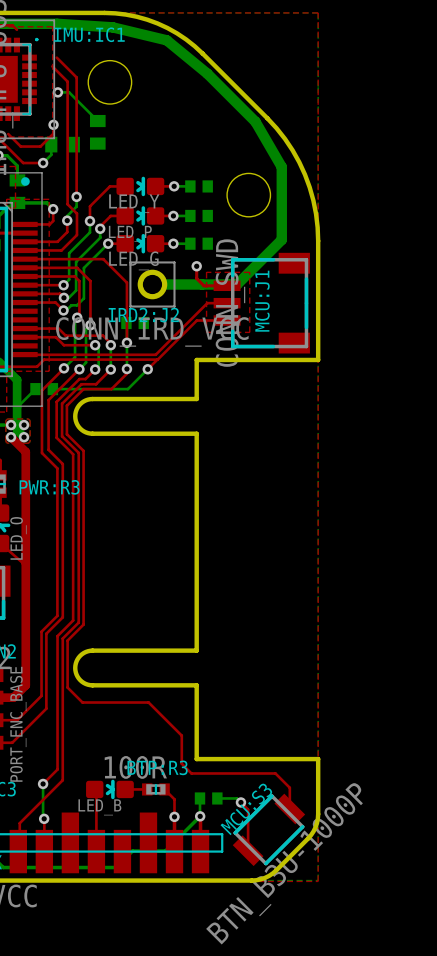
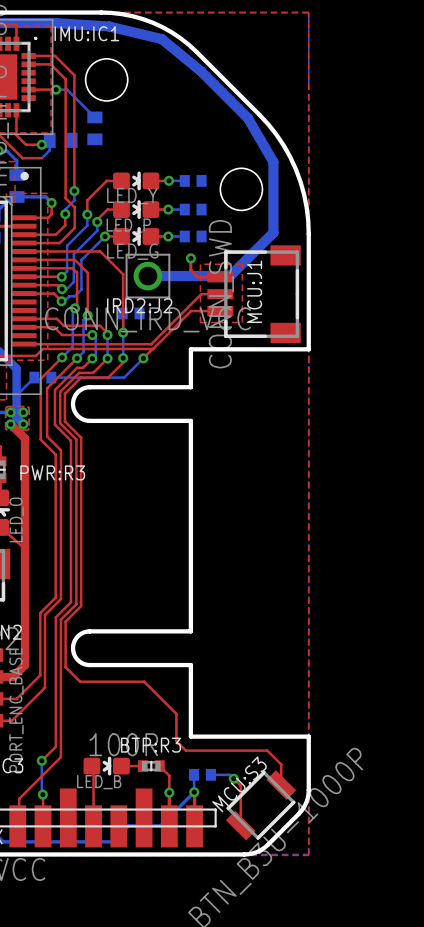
top track: (12, 25) (16, 29) -> (12, 24) (16, 24) (16, 43)
top track: none -> (28, 55) (55, 55)
top track: none -> (28, 64) (50, 64)
top track: none -> (28, 89) (56, 89)
top track: none -> (16, 110) (16, 135) (26, 144) (41, 144)
top track: (53, 124) (53, 133) (40, 146) (20, 146) (8, 134) -> none
via: (53, 124) -> none
via: none -> (41, 144)
via: (43, 163) -> none

